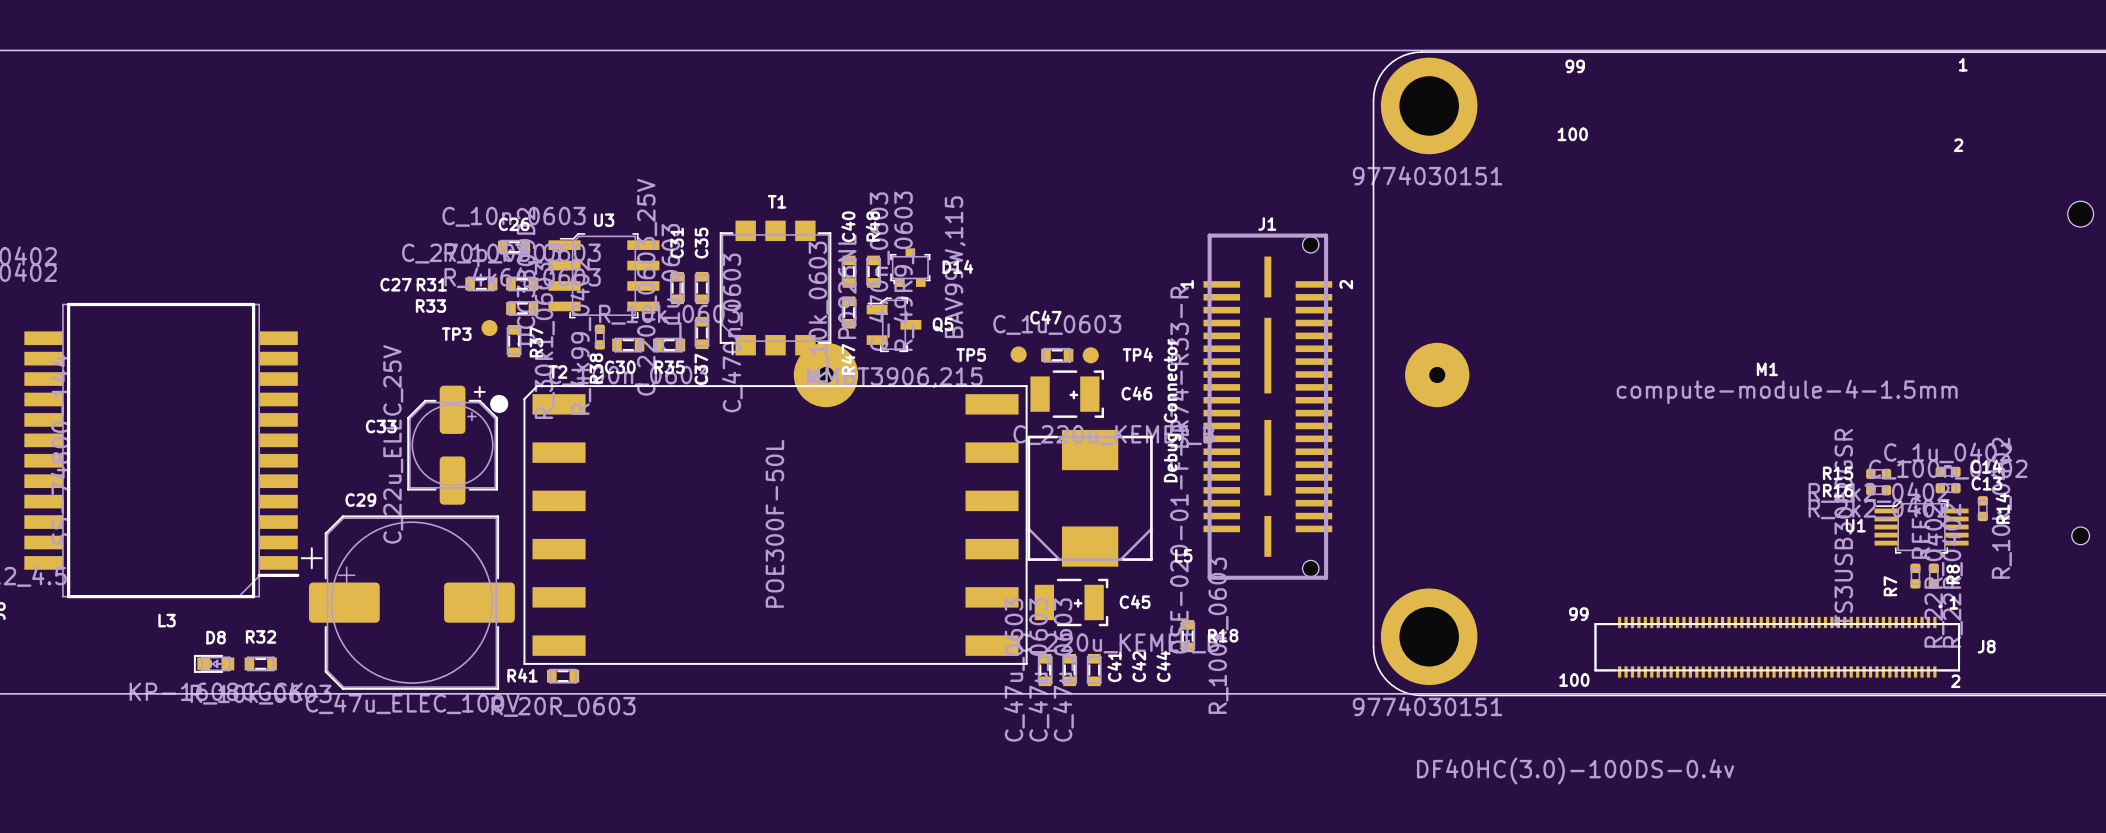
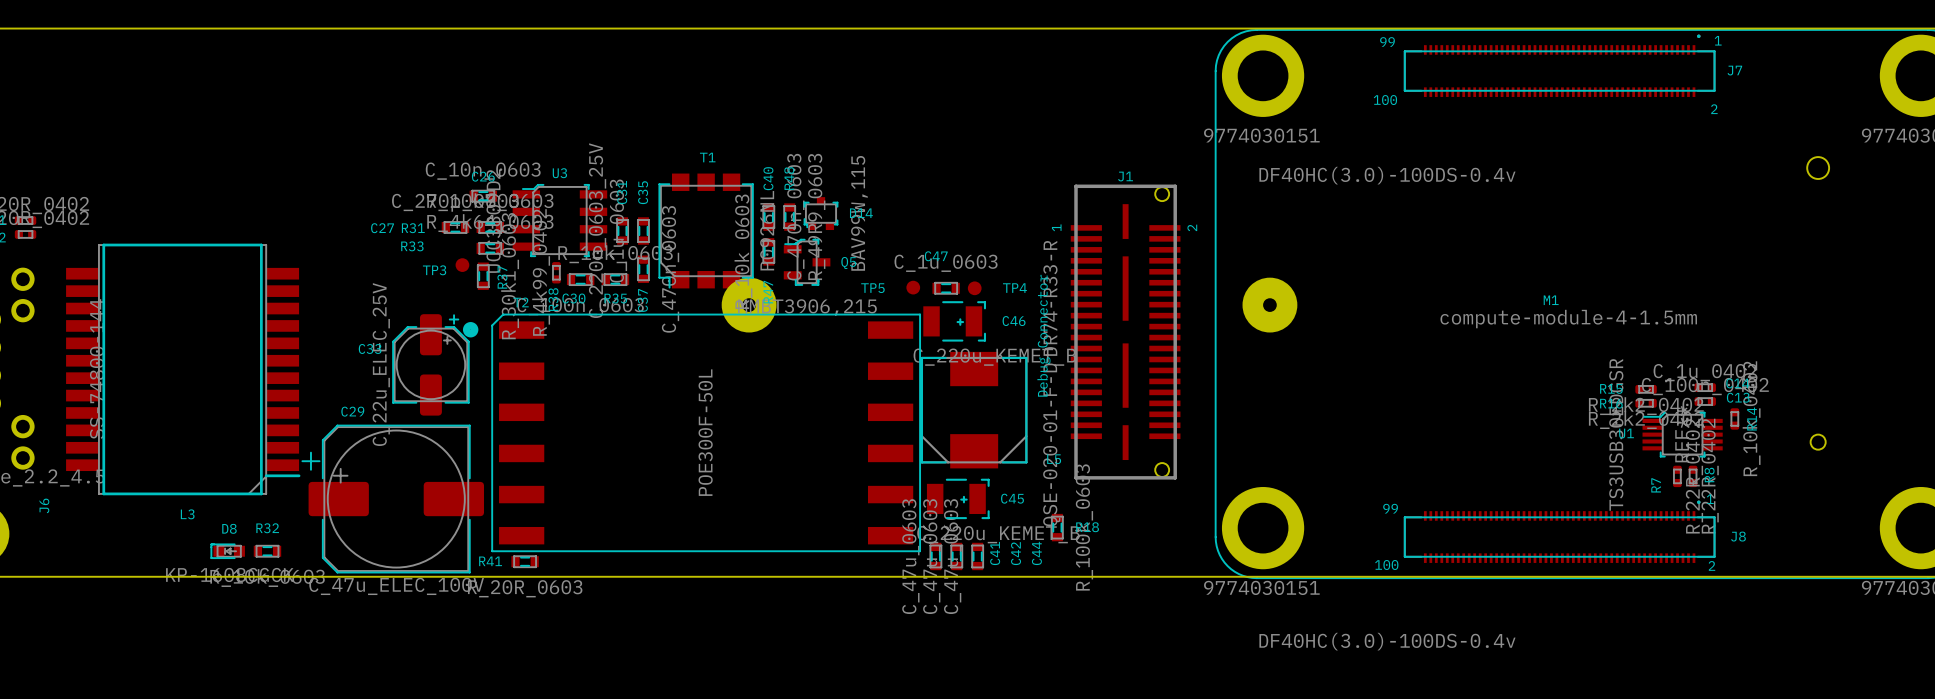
J7: none -> DF40HC(3.0)-100DS-0.4v (1559, 65)

